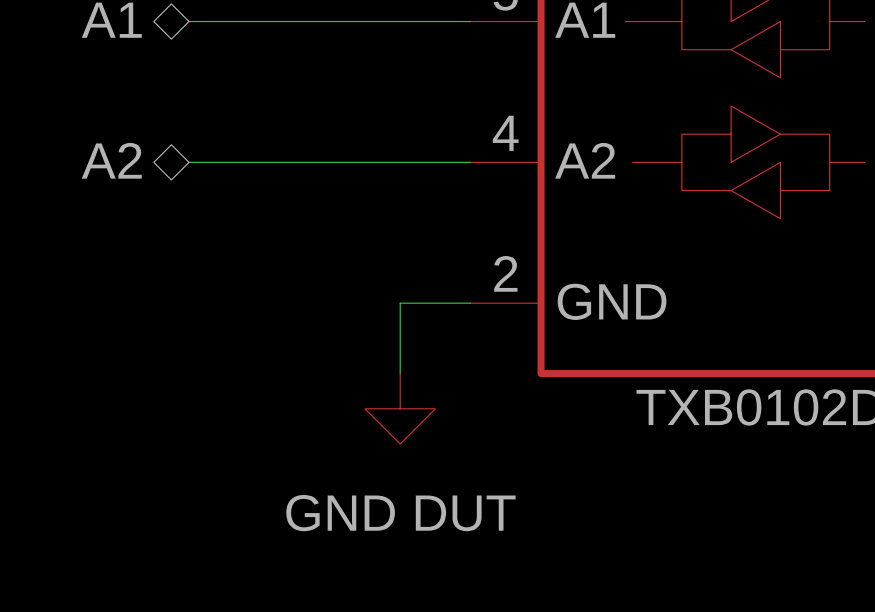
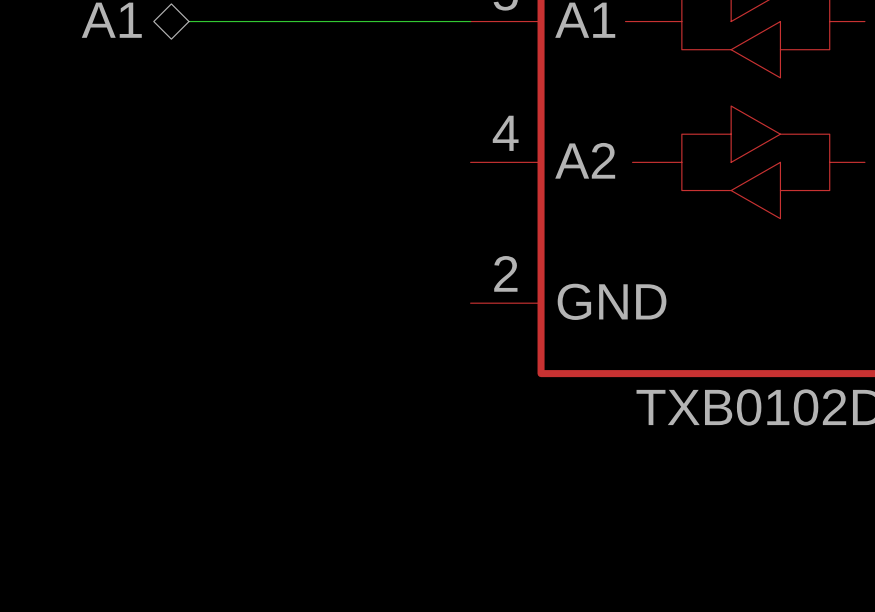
hierarchical label: A2 (111, 160) -> none
wire: (188, 162) (470, 162) -> none
wire: (470, 303) (400, 303) (400, 373) -> none
power symbol: GND DUT (400, 408) -> none

